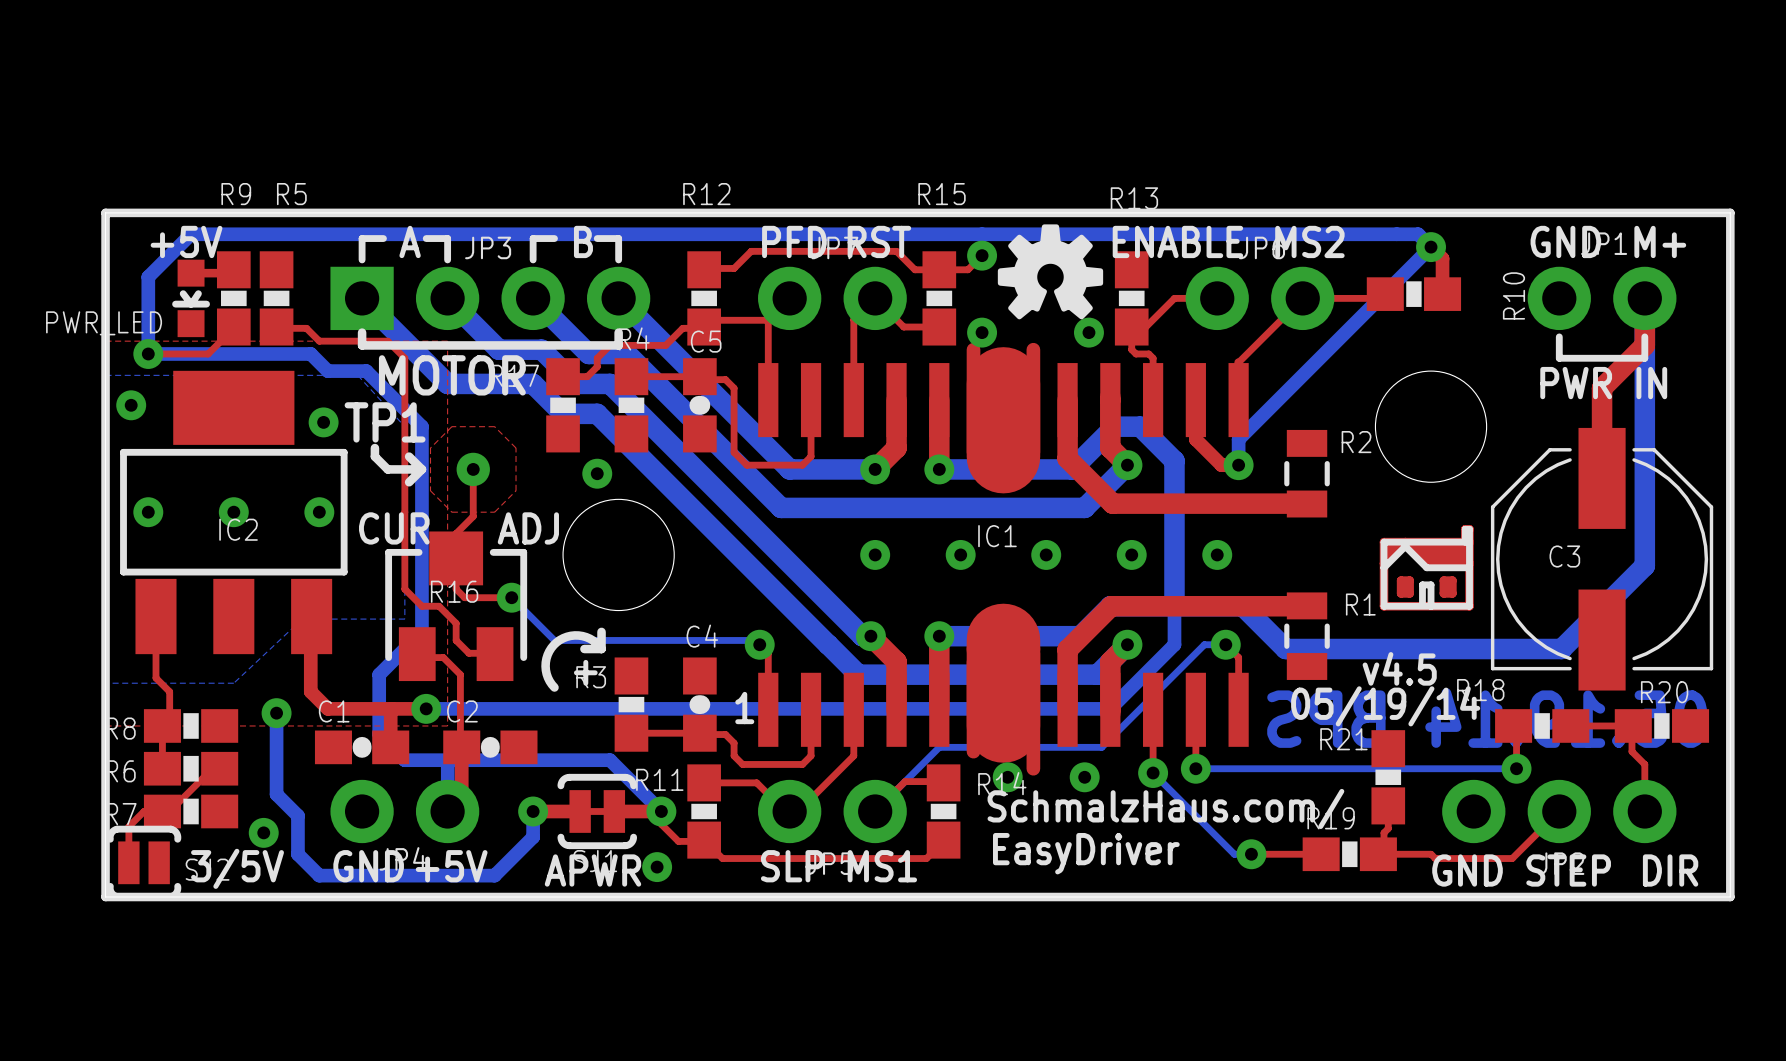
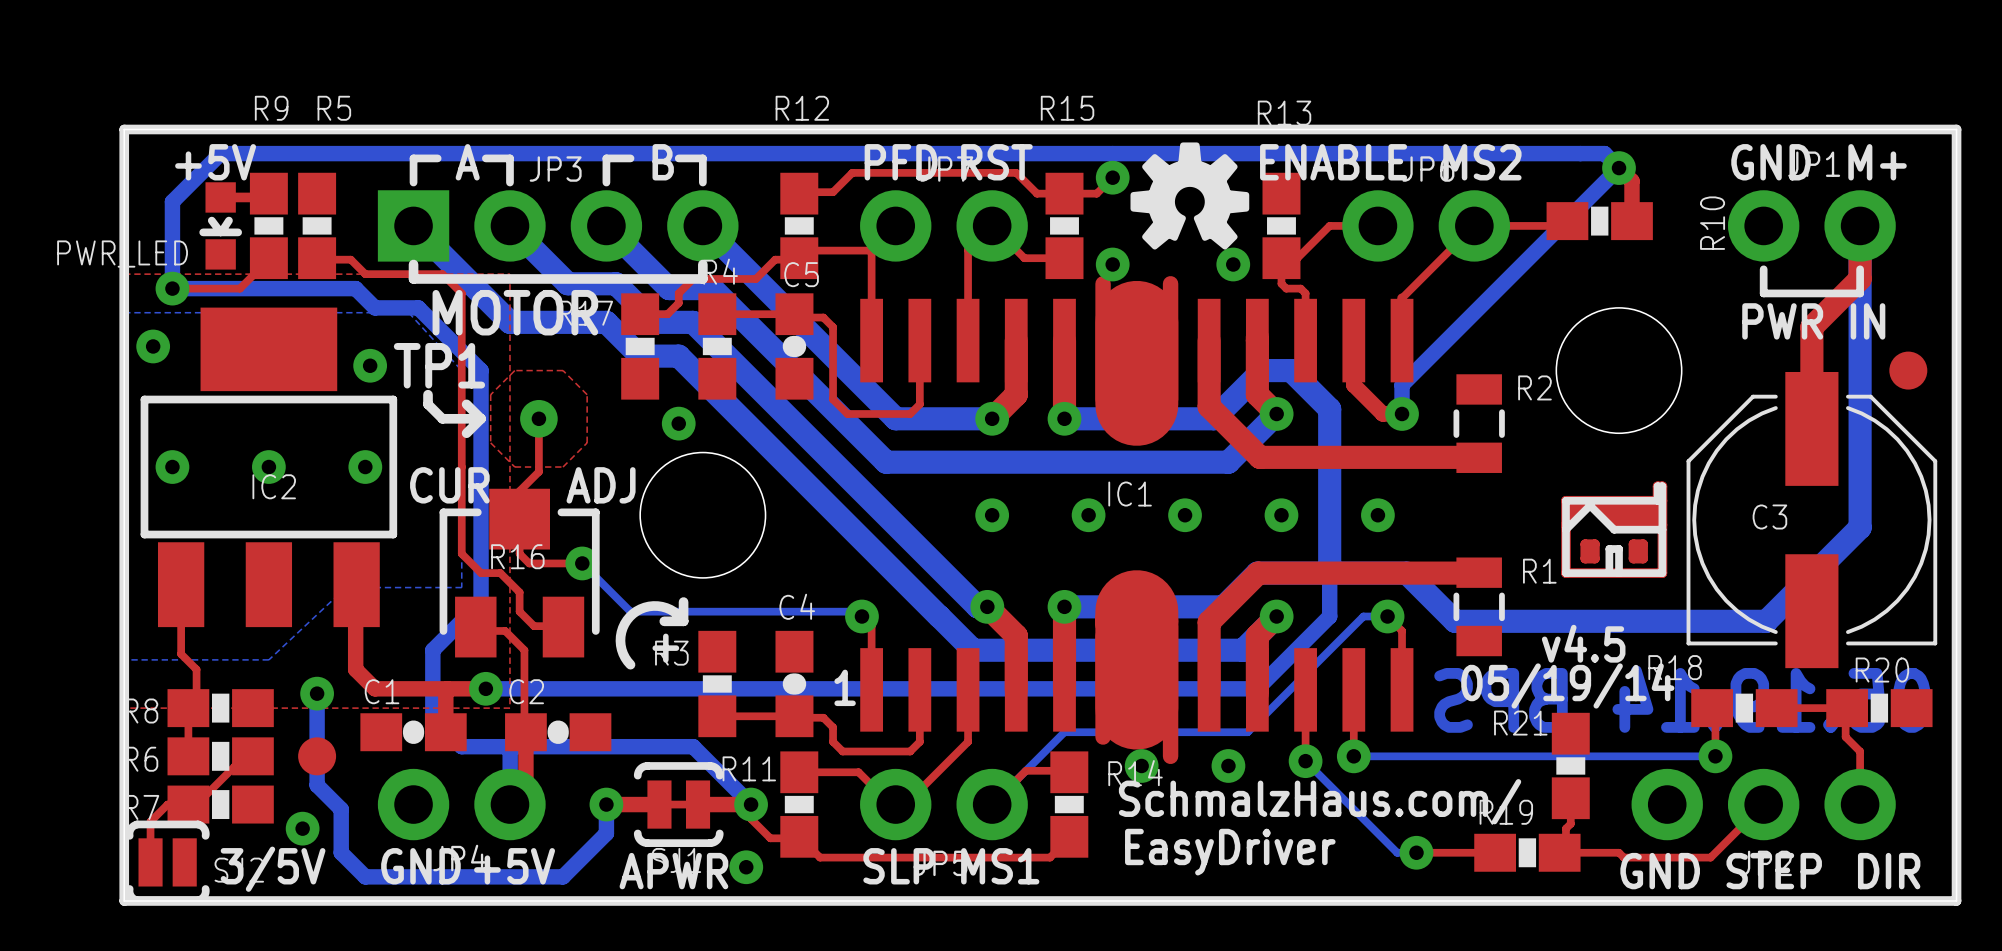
part: none -> (1908, 370)
part: none -> (317, 756)

